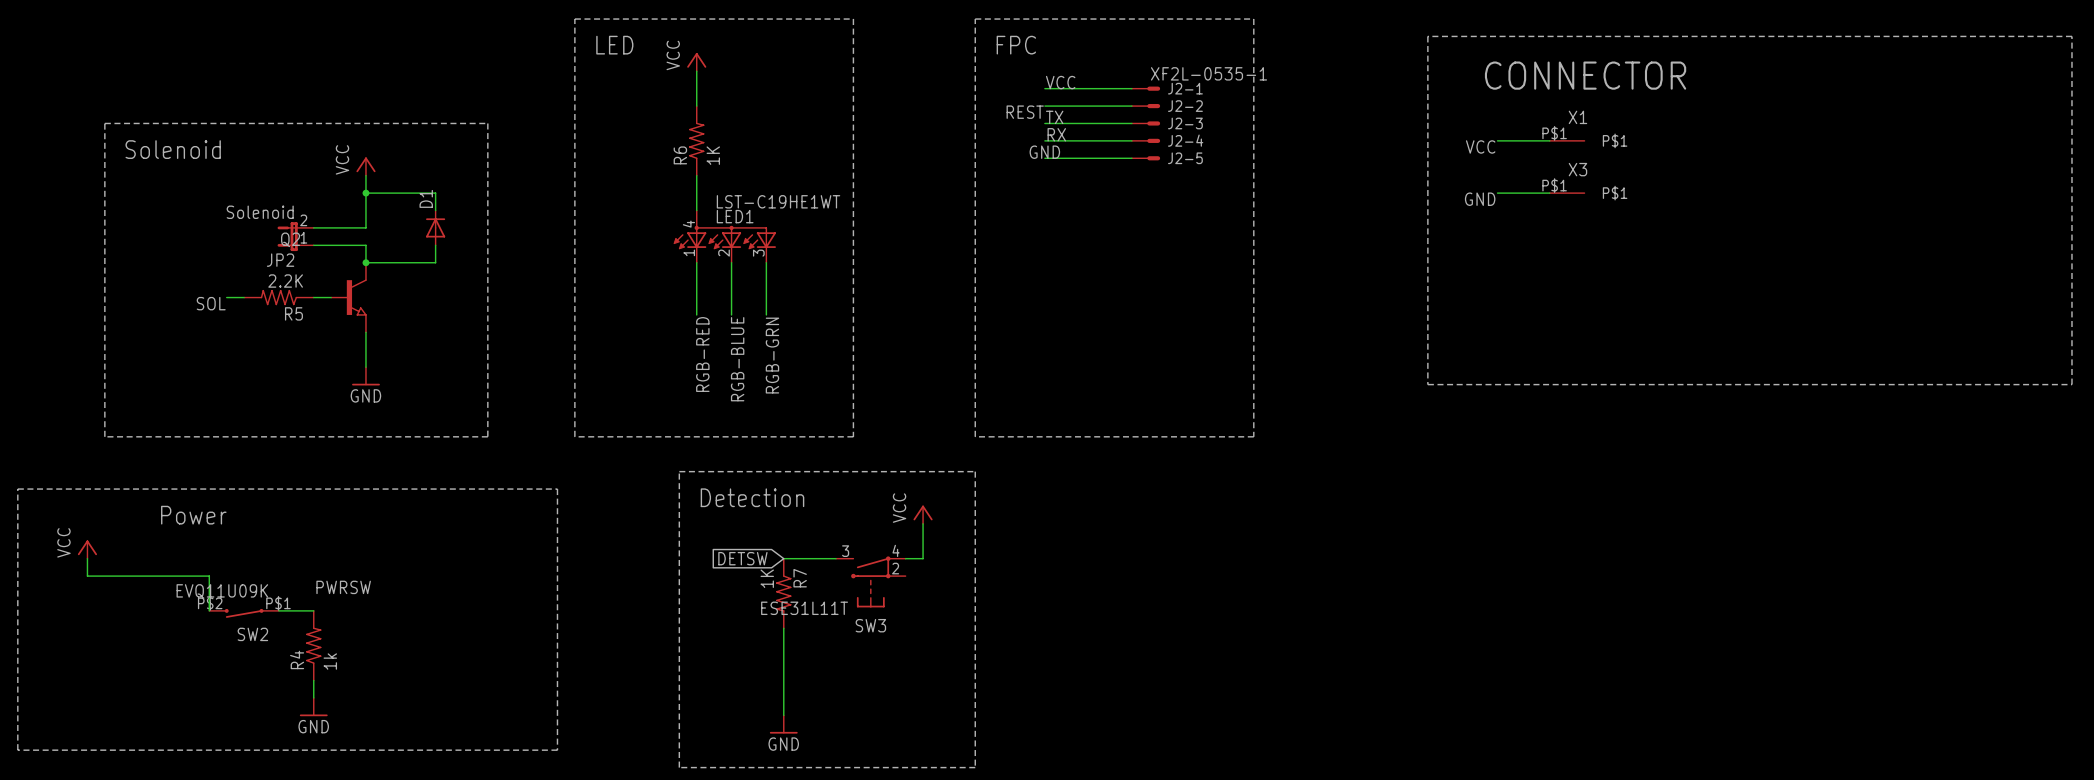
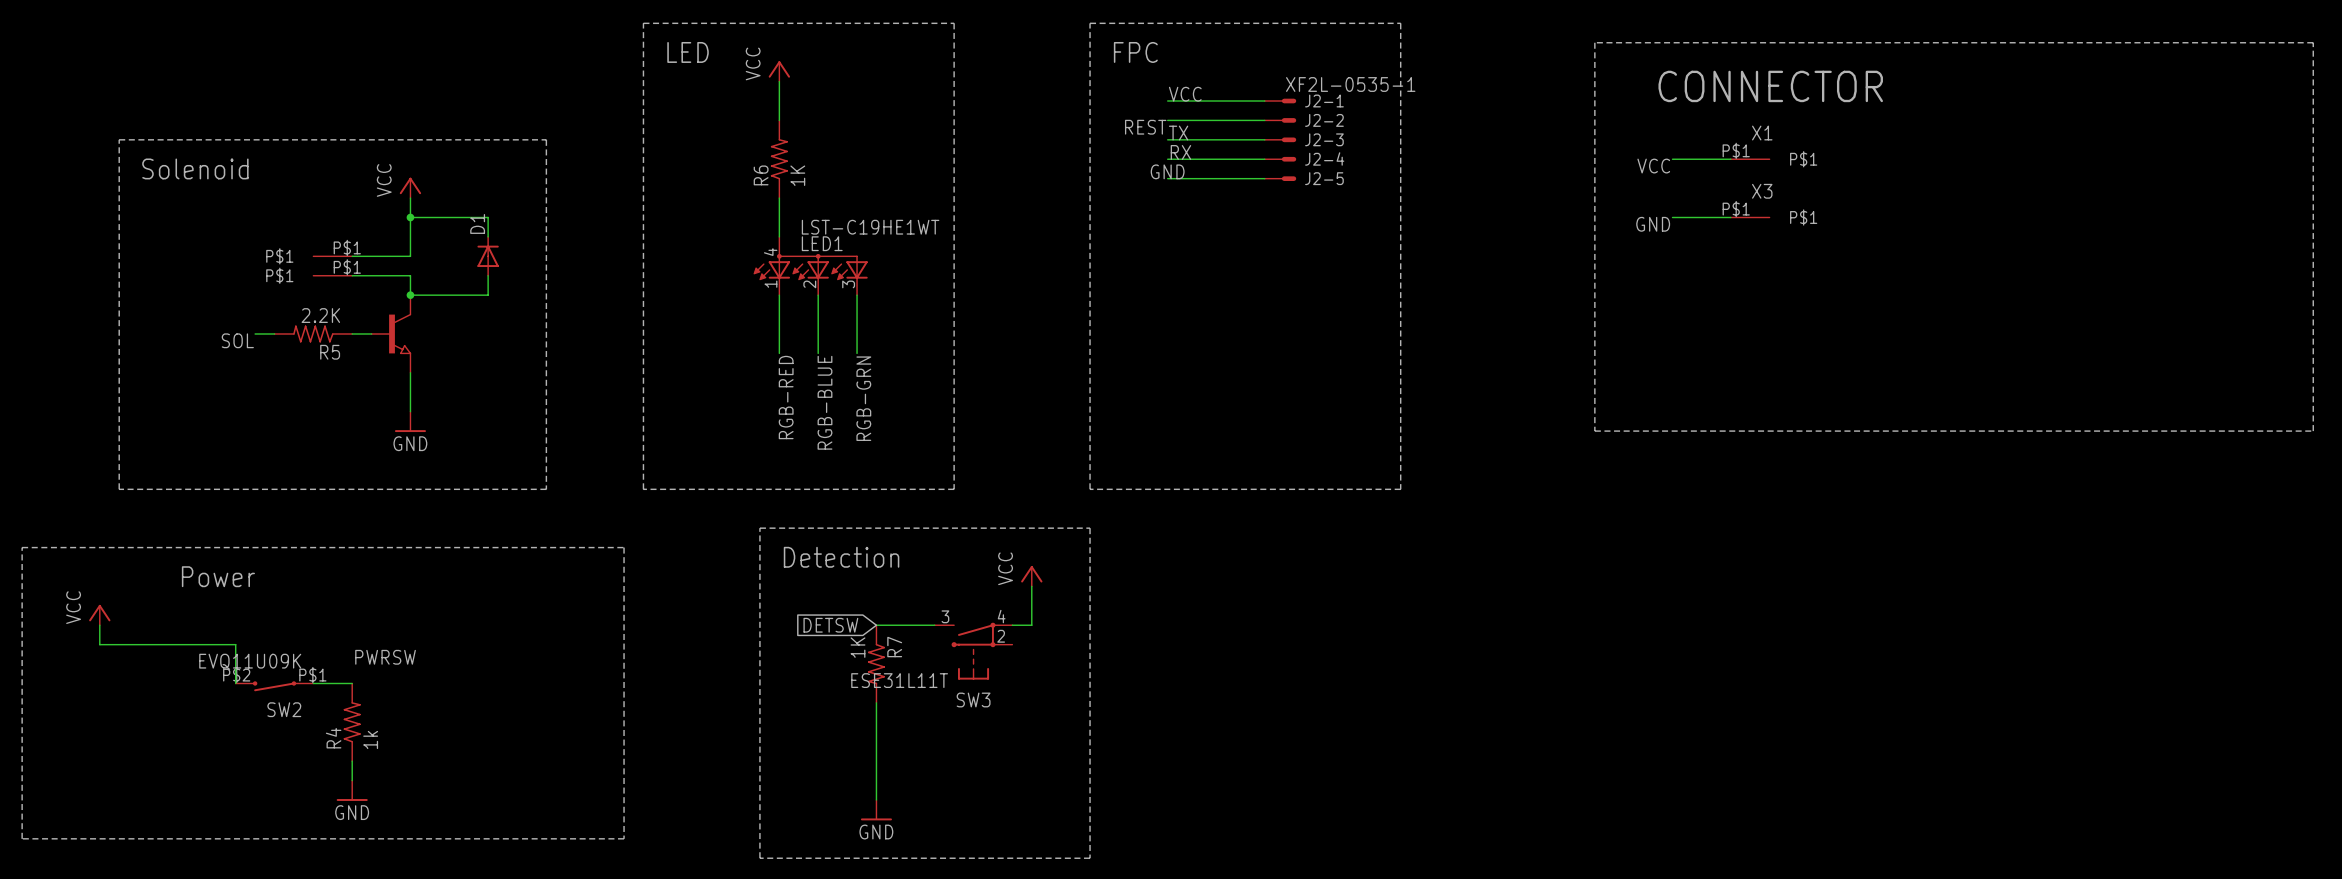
part: none -> (332, 256)
JP2: Solenoid (295, 236) -> none
Q2 name: Q2 (290, 239) -> none
part: none -> (332, 275)

